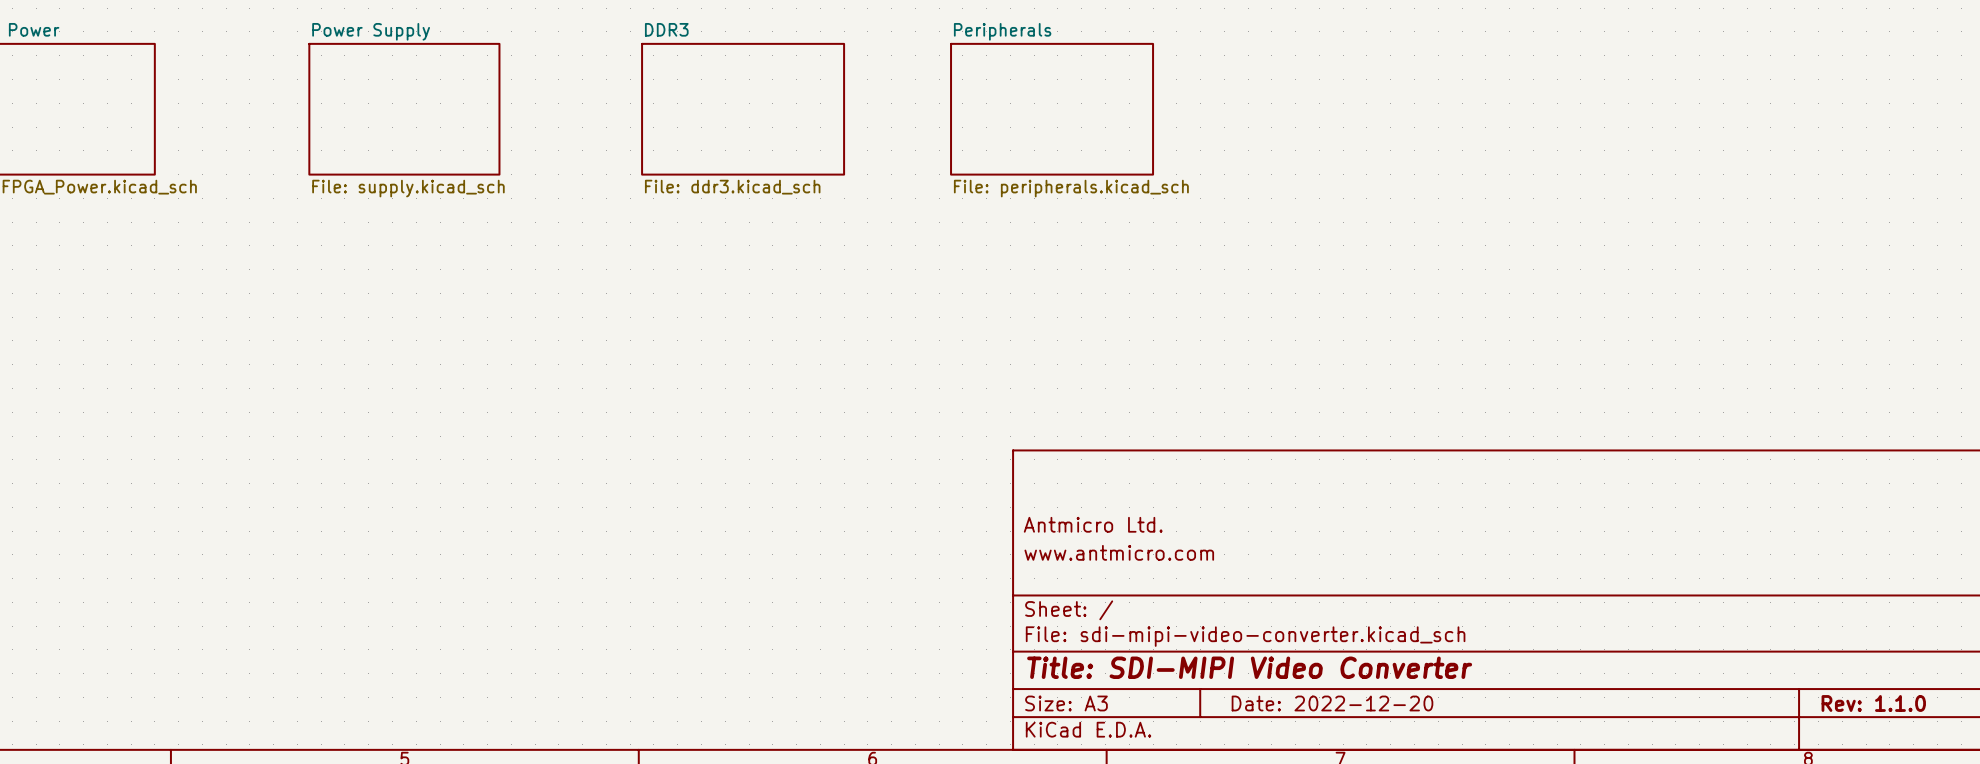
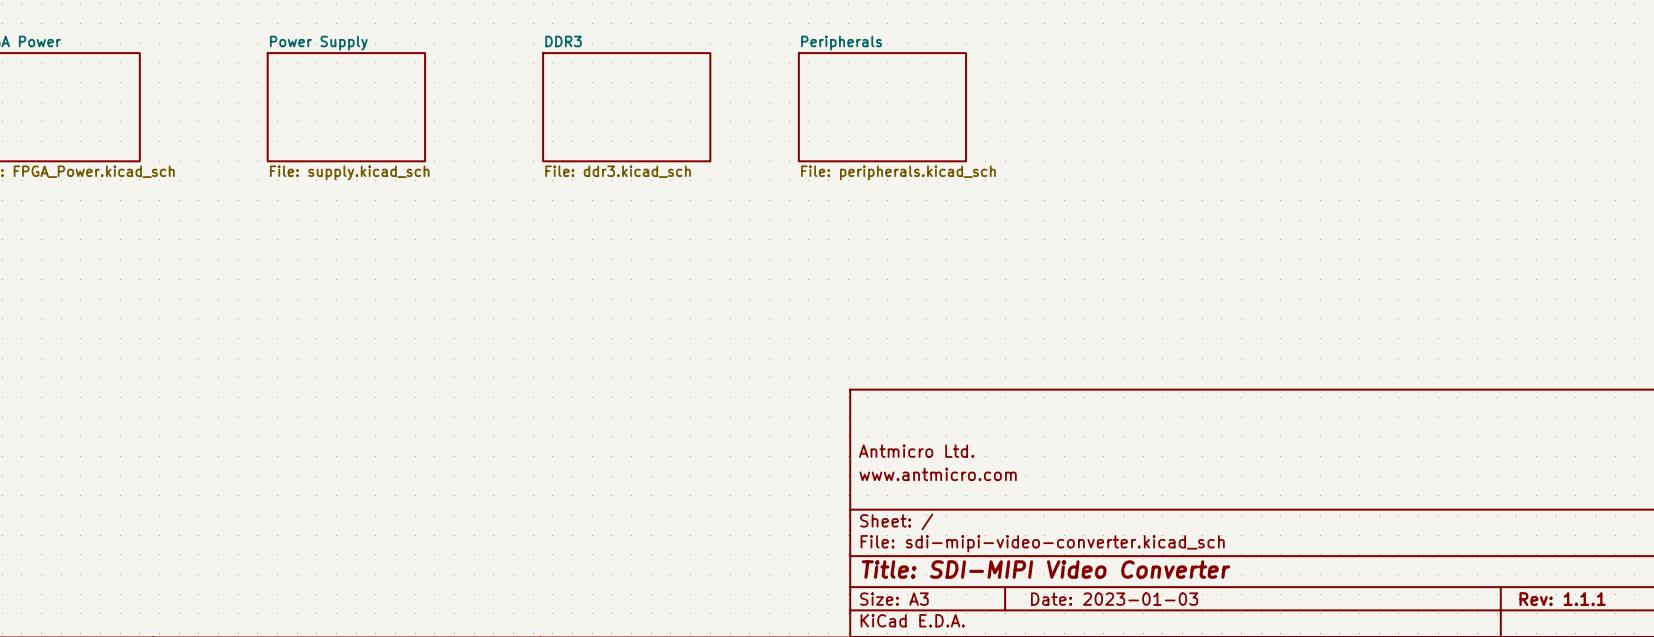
title block: Date: 2022-12-20 (1332, 703) -> Date: 2023-01-03 (1114, 599)
title block: Rev: 1.1.0 (1873, 703) -> Rev: 1.1.1 (1562, 599)

